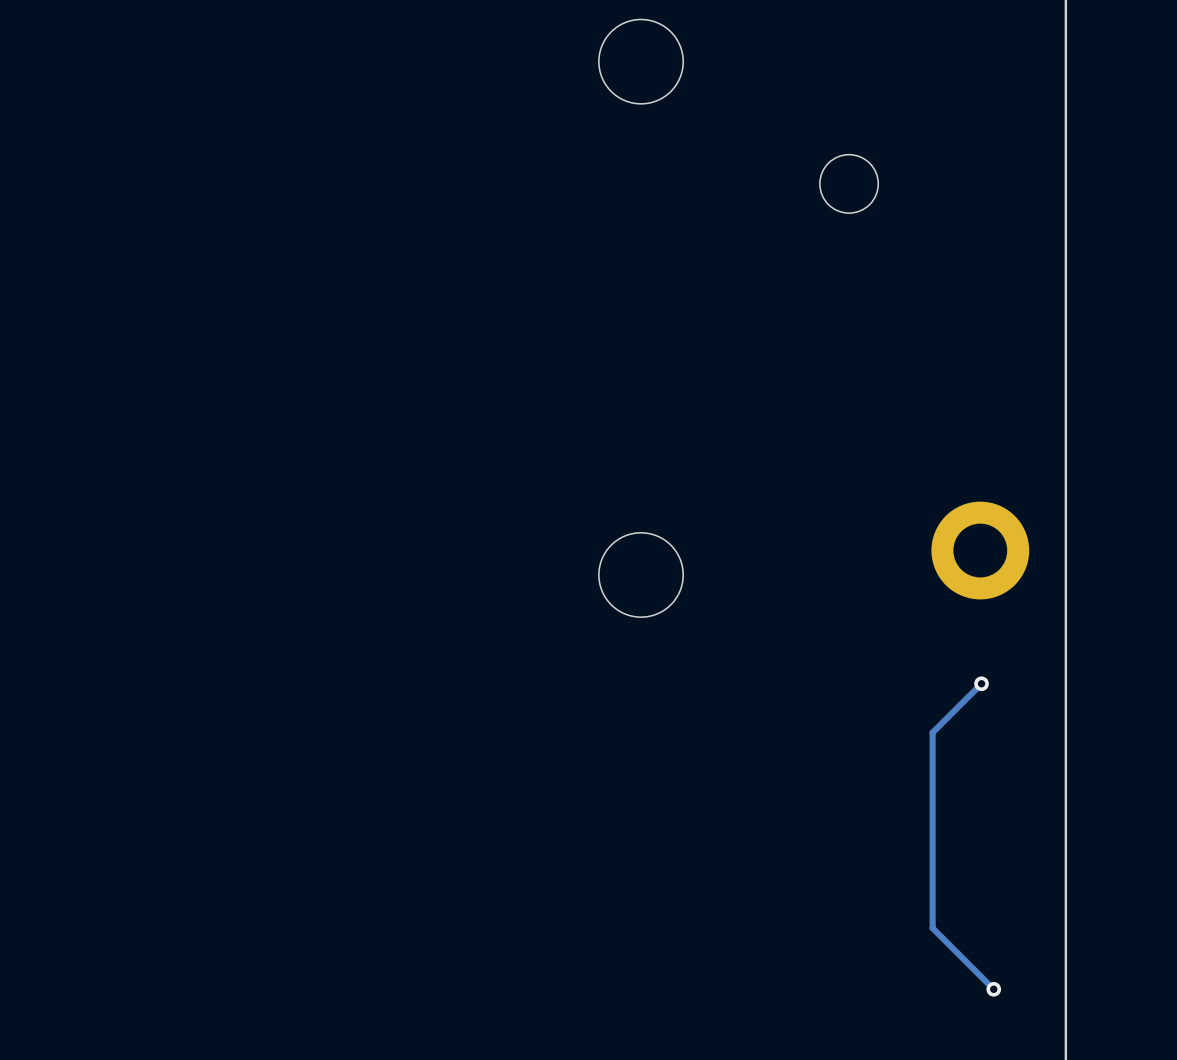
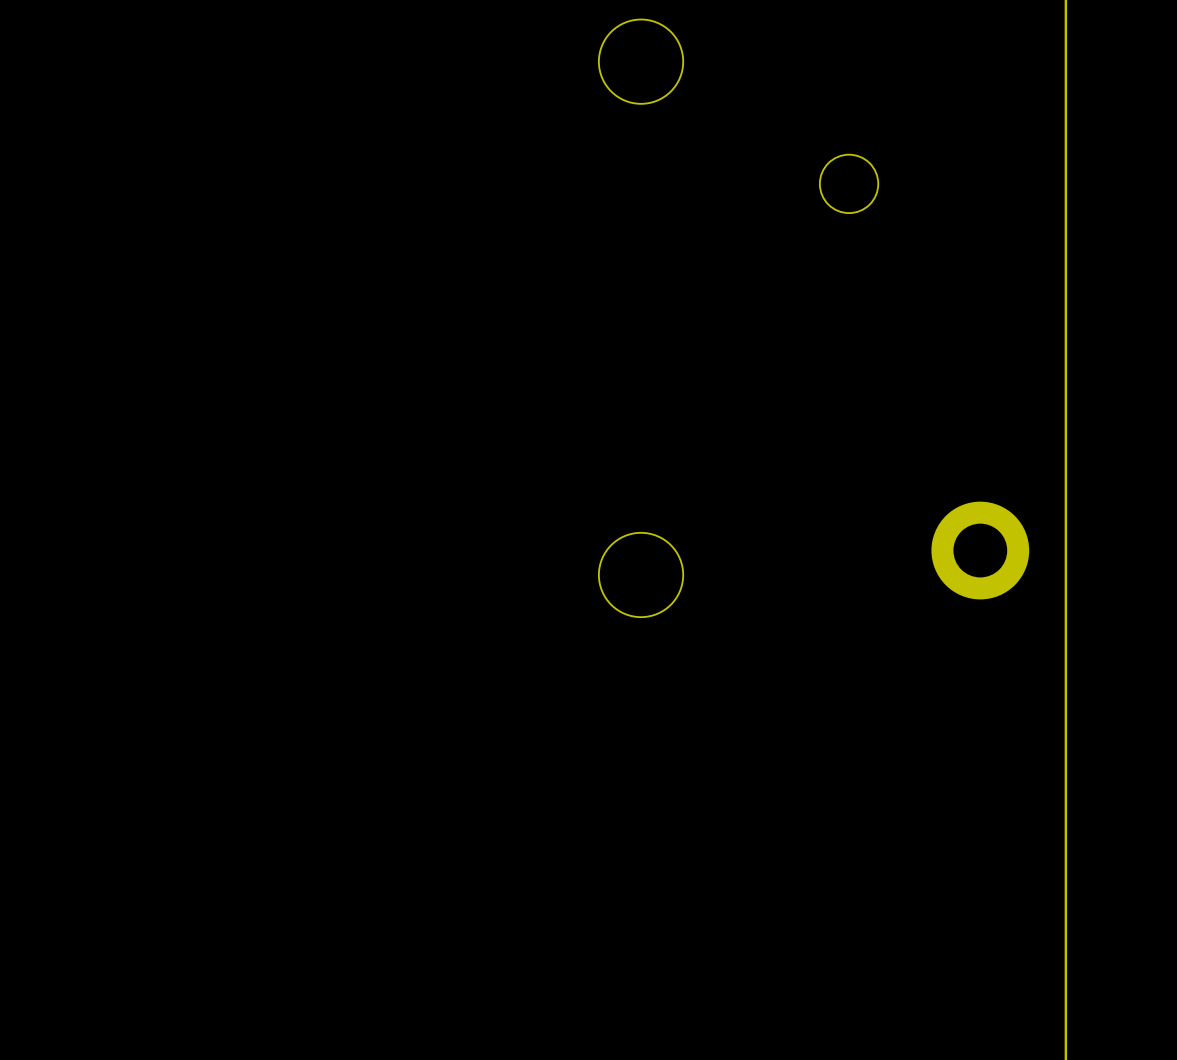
track: (981, 683) (932, 732) (932, 928) (993, 989) -> none
via: (981, 683) -> none
via: (993, 989) -> none

